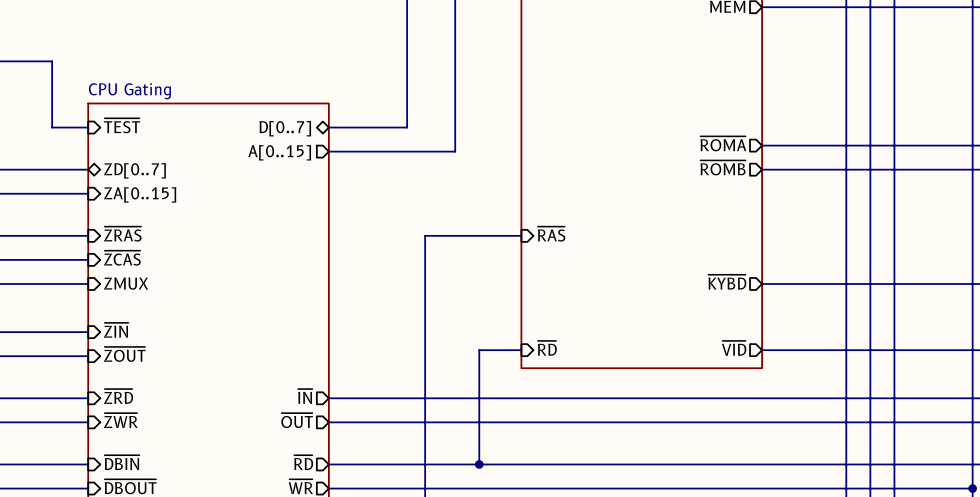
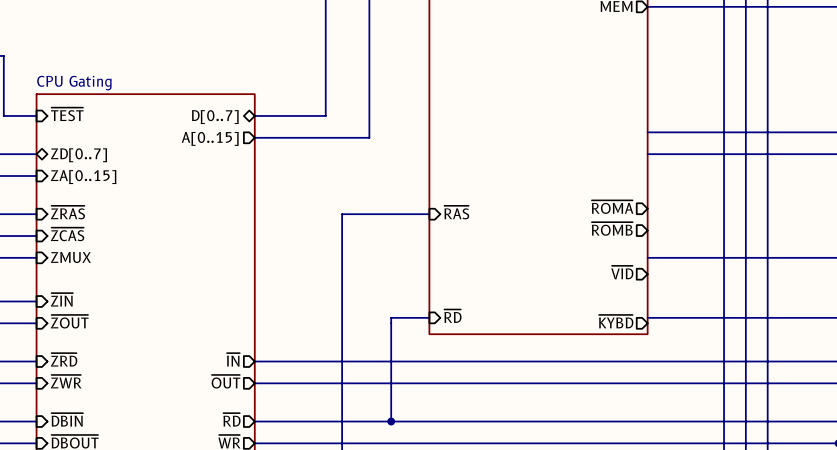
sheet pin position: ~{ROMA} (723, 143) -> ~{ROMA} (612, 207)
sheet pin position: ~{ROMB} (723, 167) -> ~{ROMB} (612, 228)
sheet pin position: ~{KYBD} (727, 282) -> ~{KYBD} (616, 321)
sheet pin position: ~{VID} (734, 348) -> ~{VID} (622, 272)

